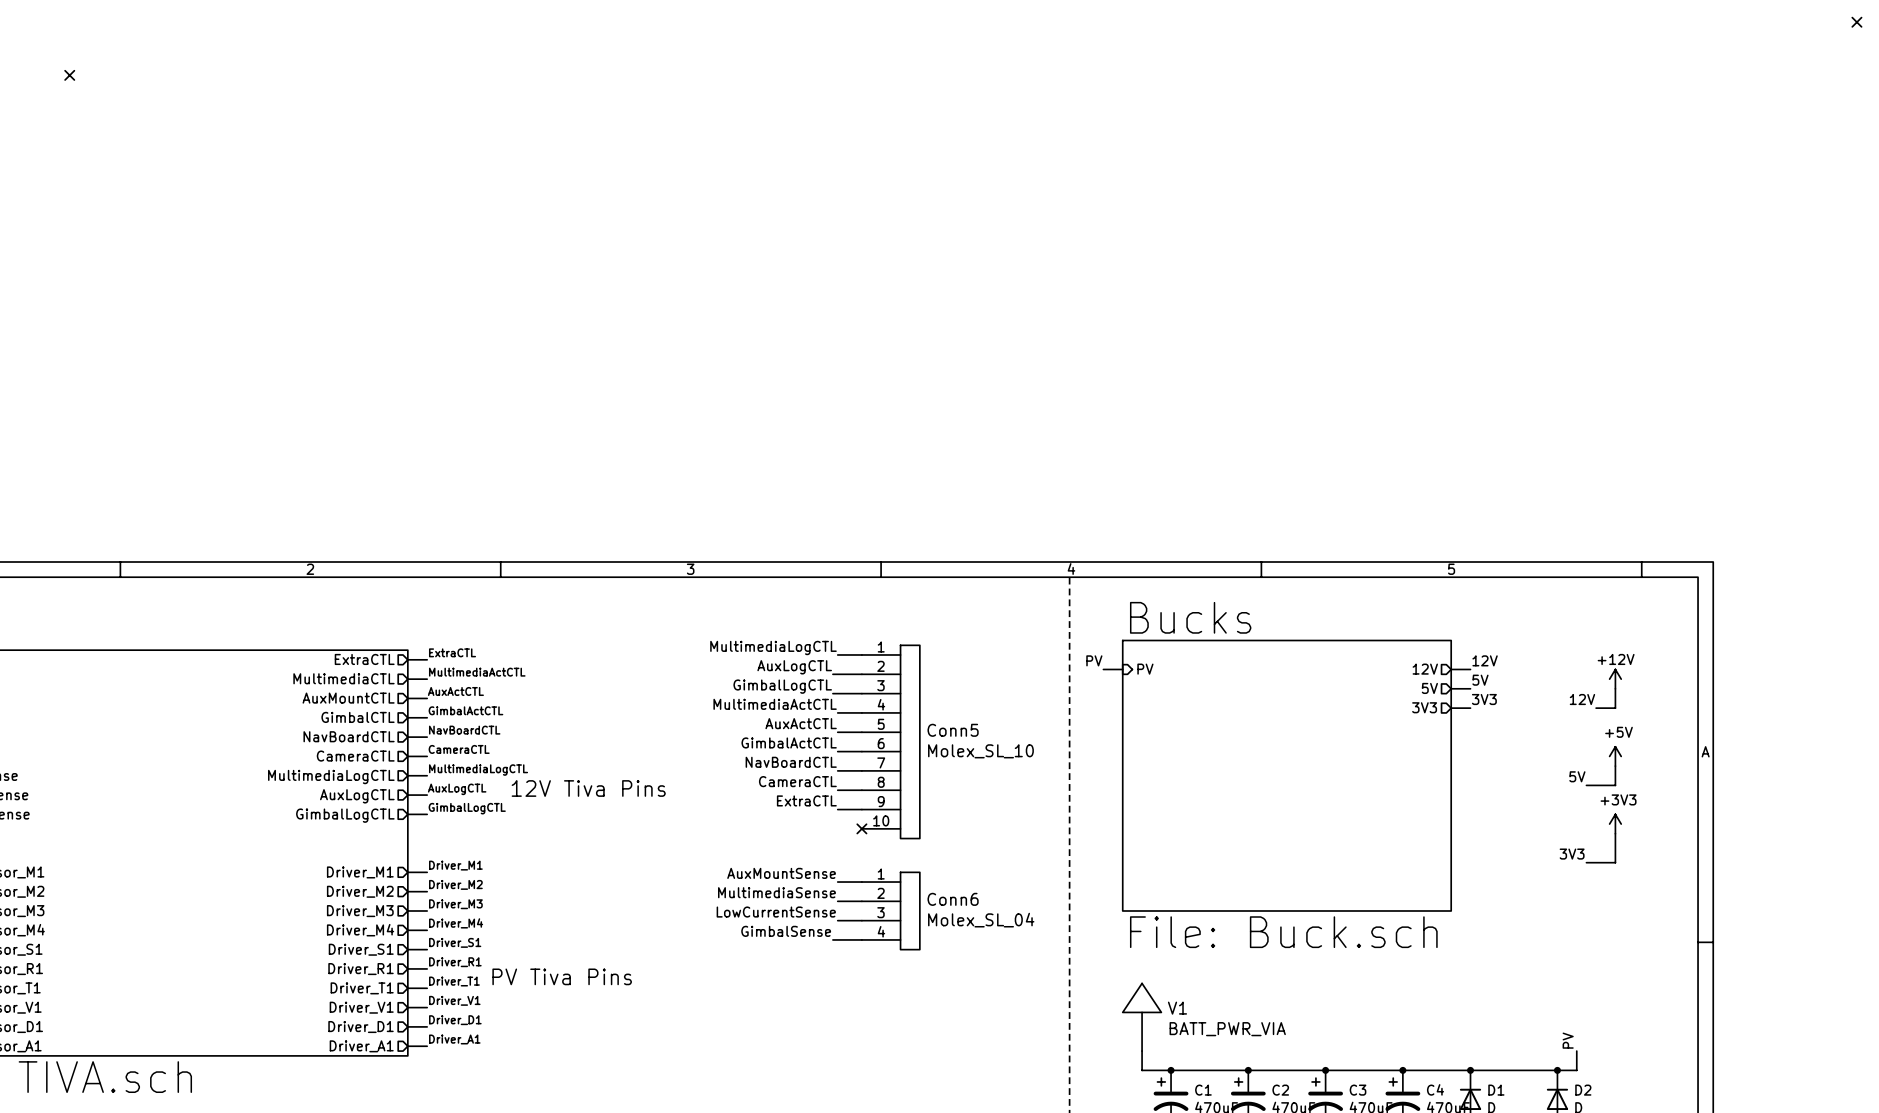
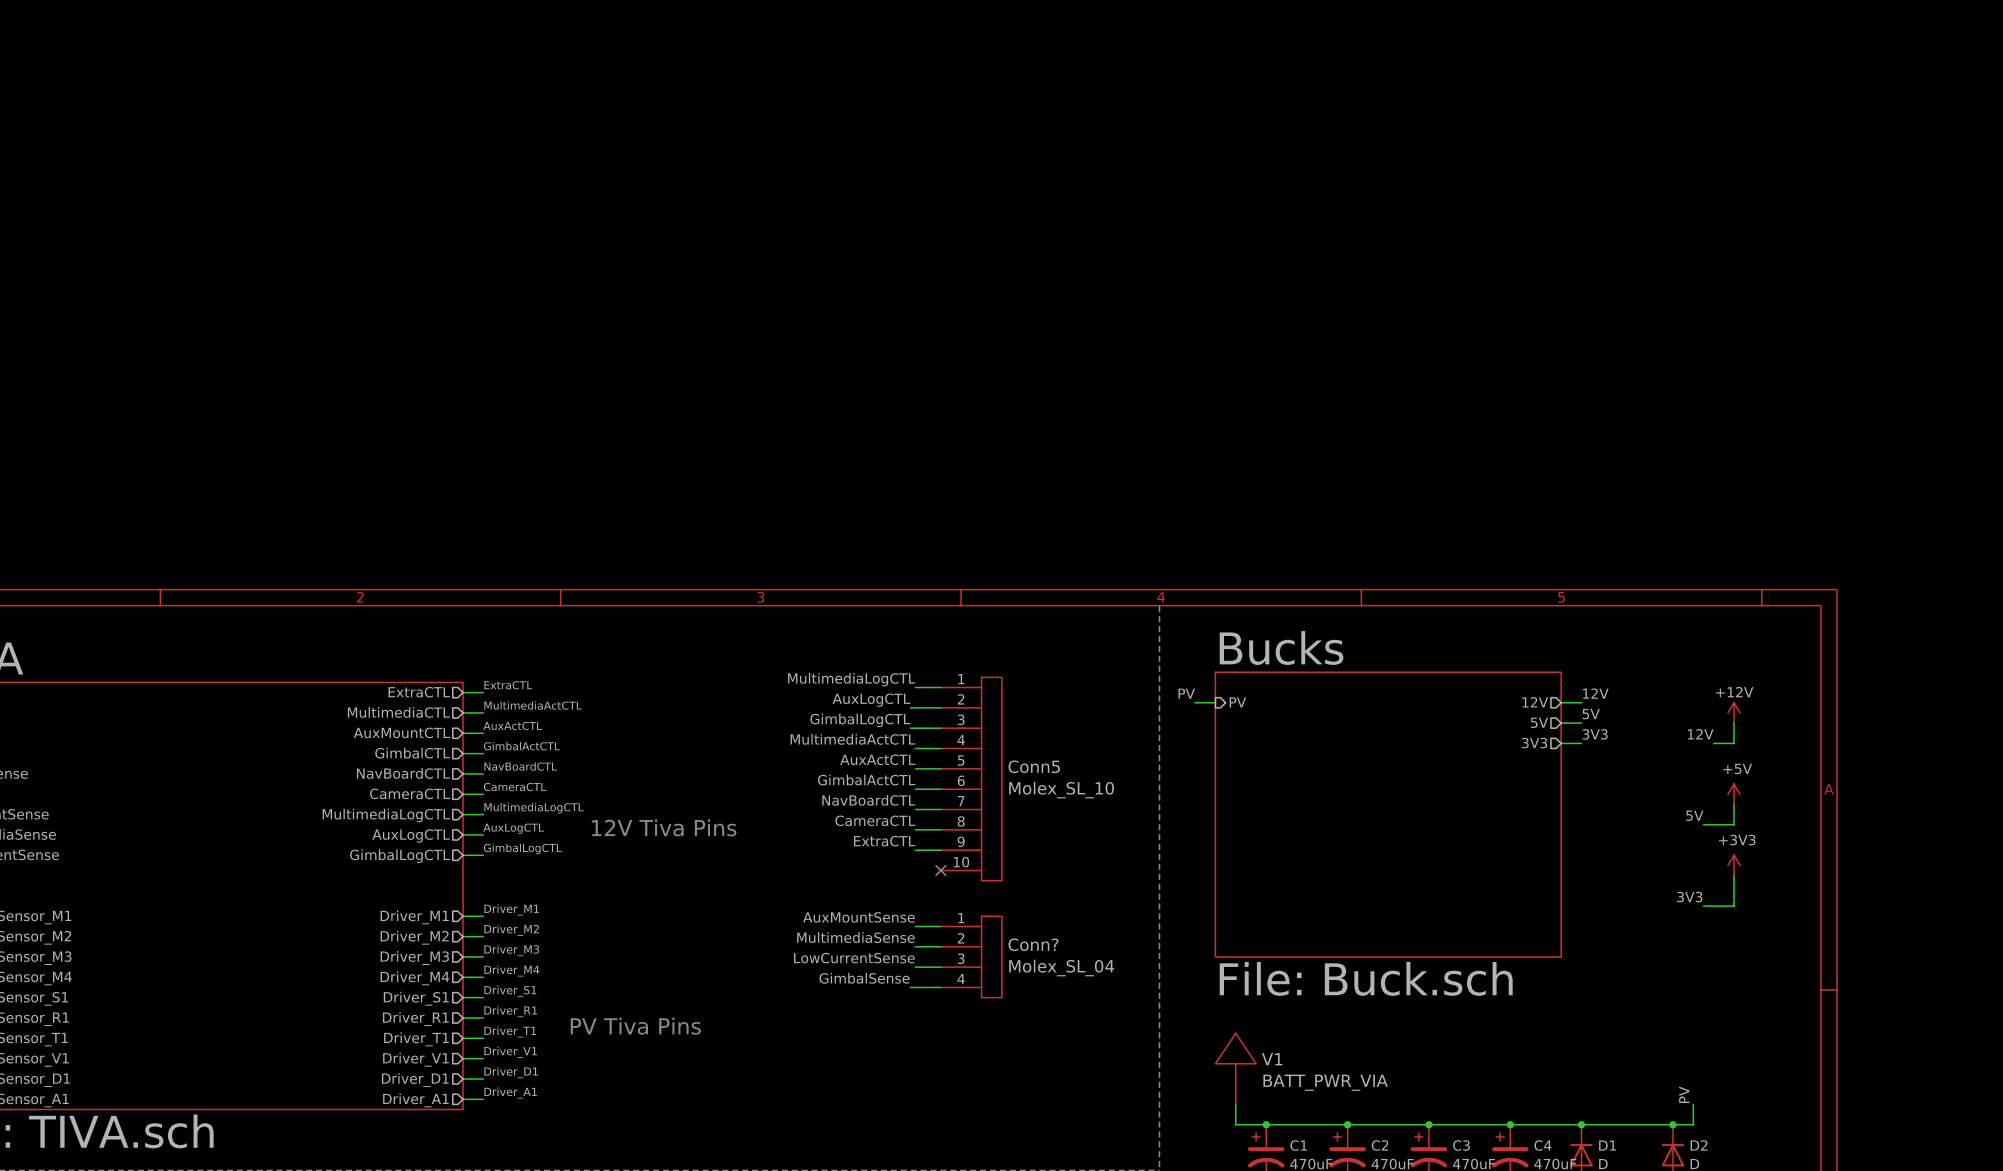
no-connect mark: (1856, 22) -> none
no-connect mark: (69, 75) -> none
Conn6 name: Conn6 (953, 899) -> Conn? (1033, 944)

